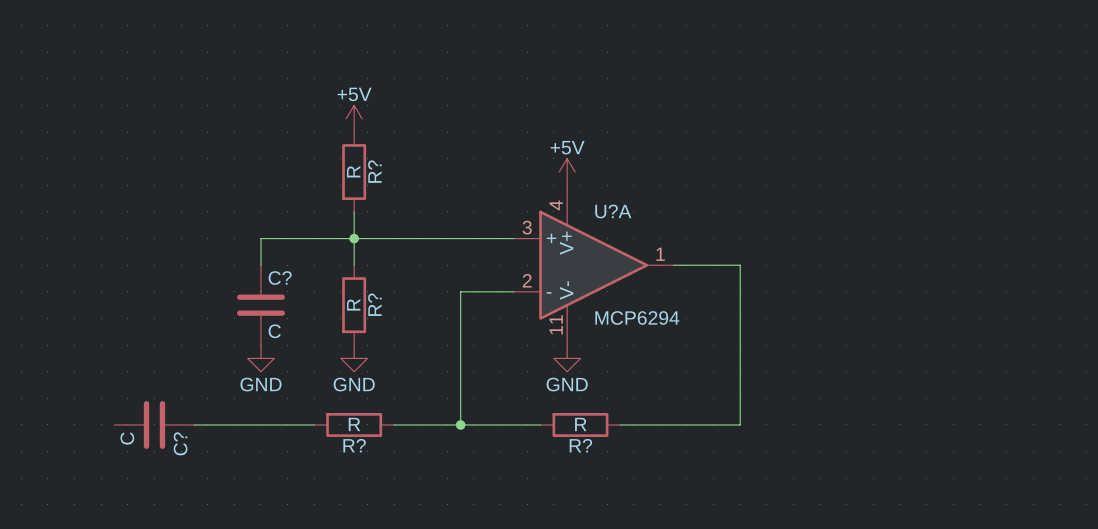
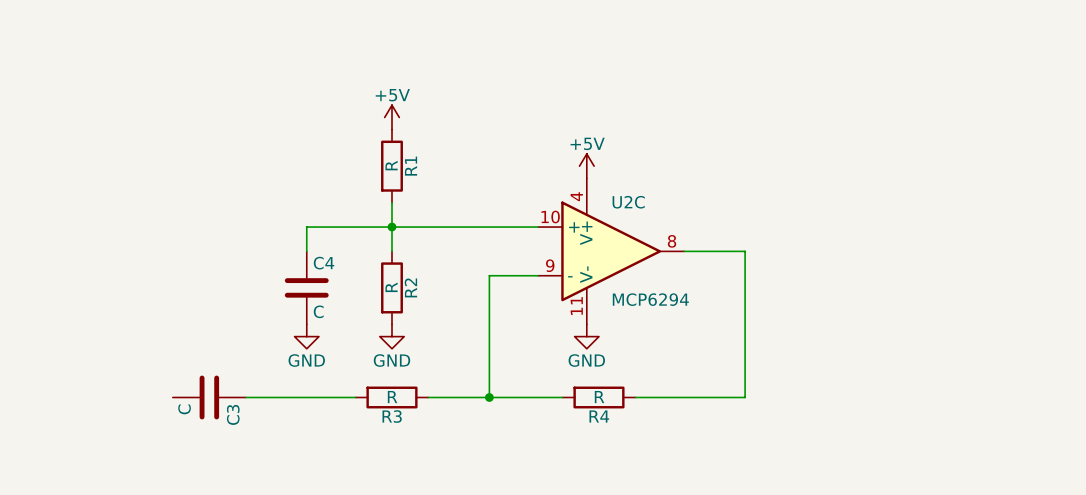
R? name: R? (374, 171) -> R1 (411, 166)
U?A name: U?A (613, 211) -> U2C (628, 202)
U?A pin number: 3 (527, 227) -> 10 (550, 217)
U?A pin number: 1 (660, 254) -> 8 (672, 241)
C? name: C? (280, 278) -> C4 (323, 263)
U?A pin number: 2 (527, 280) -> 9 (550, 265)
R? name: R? (374, 304) -> R2 (410, 287)
C? name: C? (180, 443) -> C3 (233, 414)
R? name: R? (354, 445) -> R3 (392, 416)
R? name: R? (580, 445) -> R4 (599, 416)

